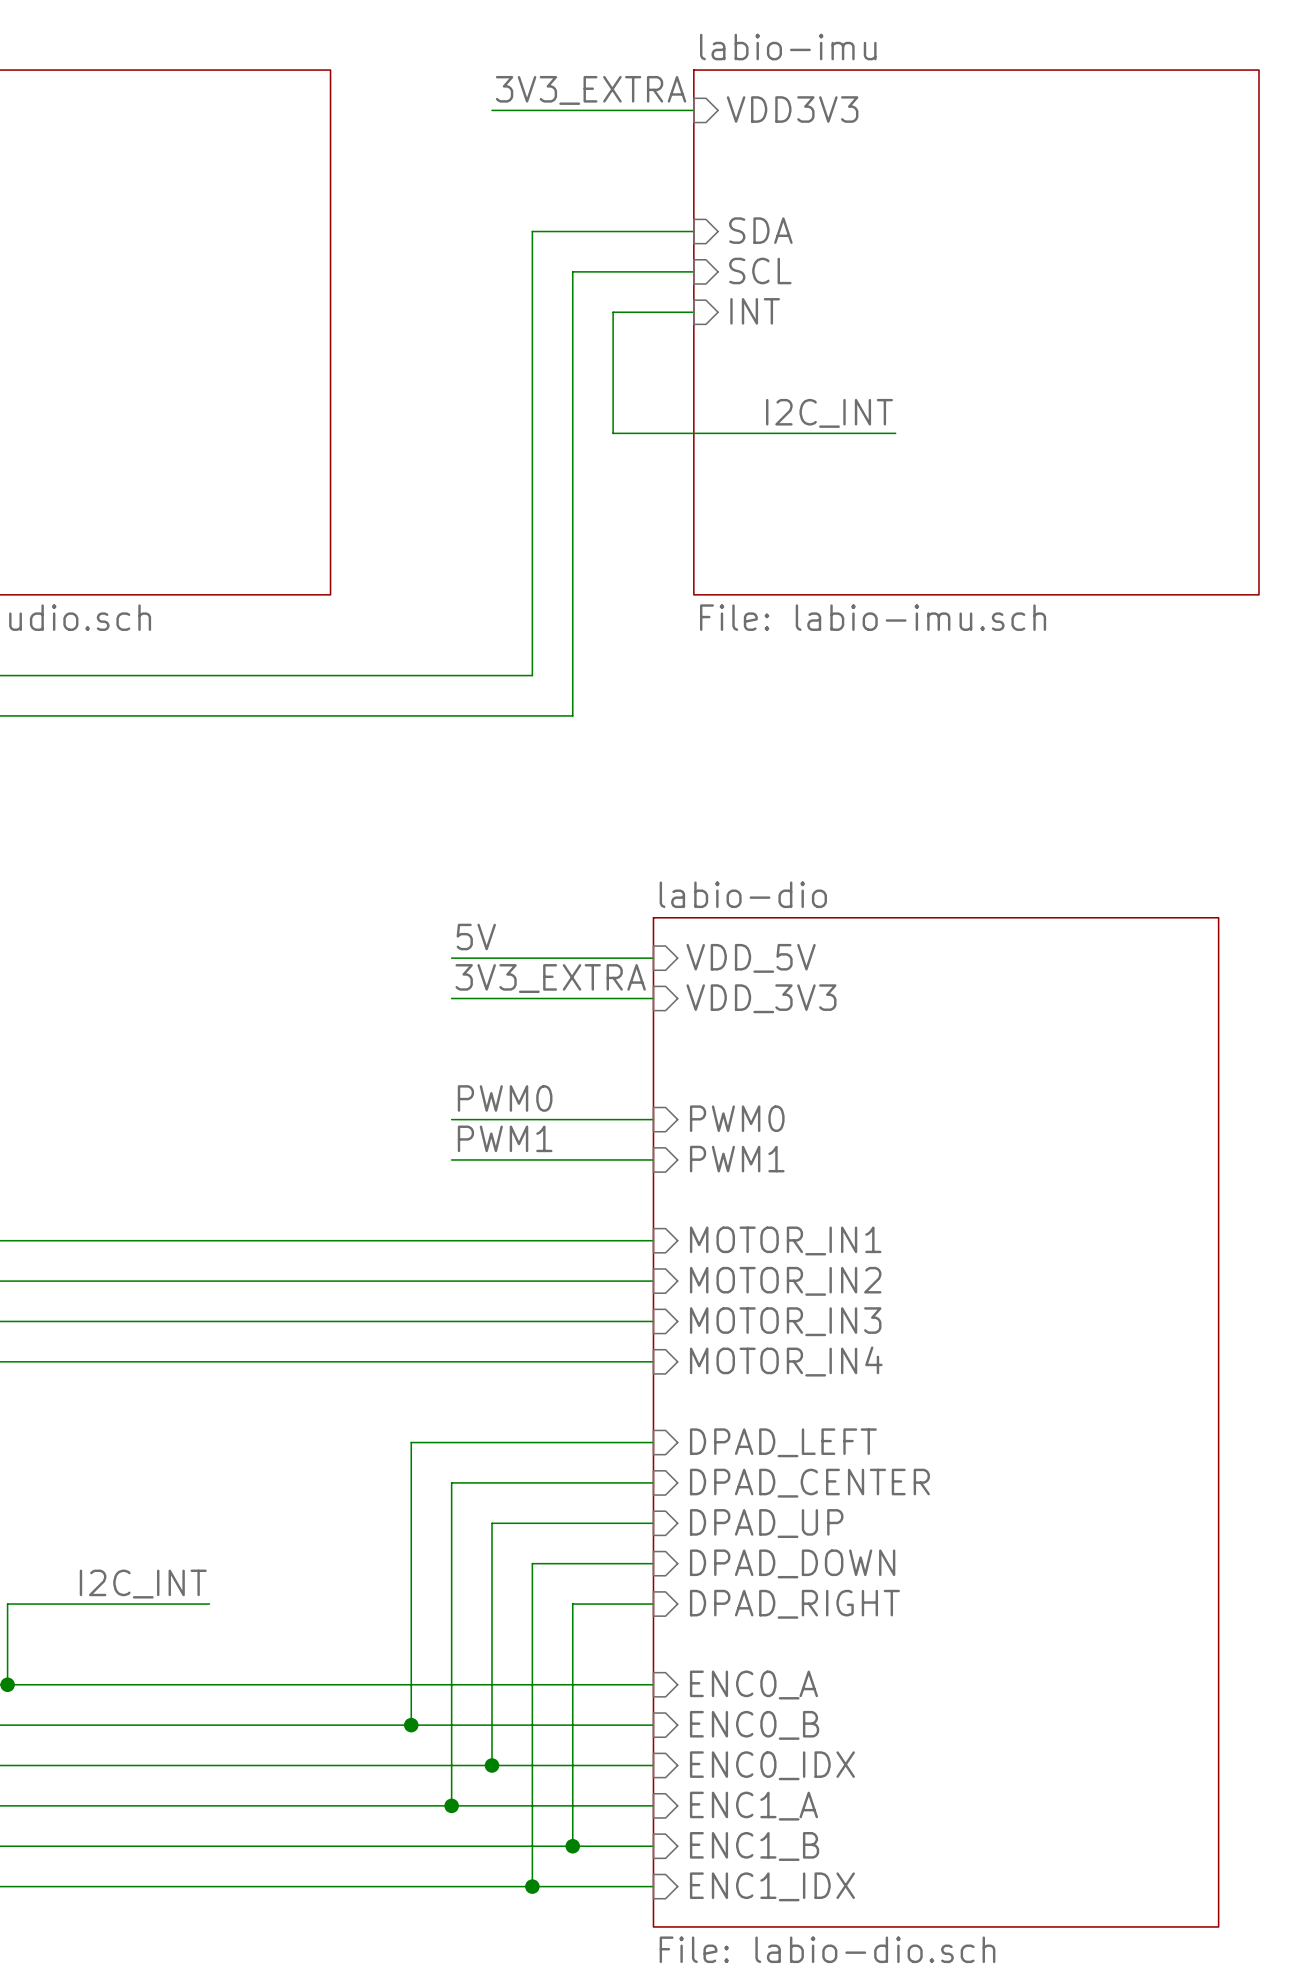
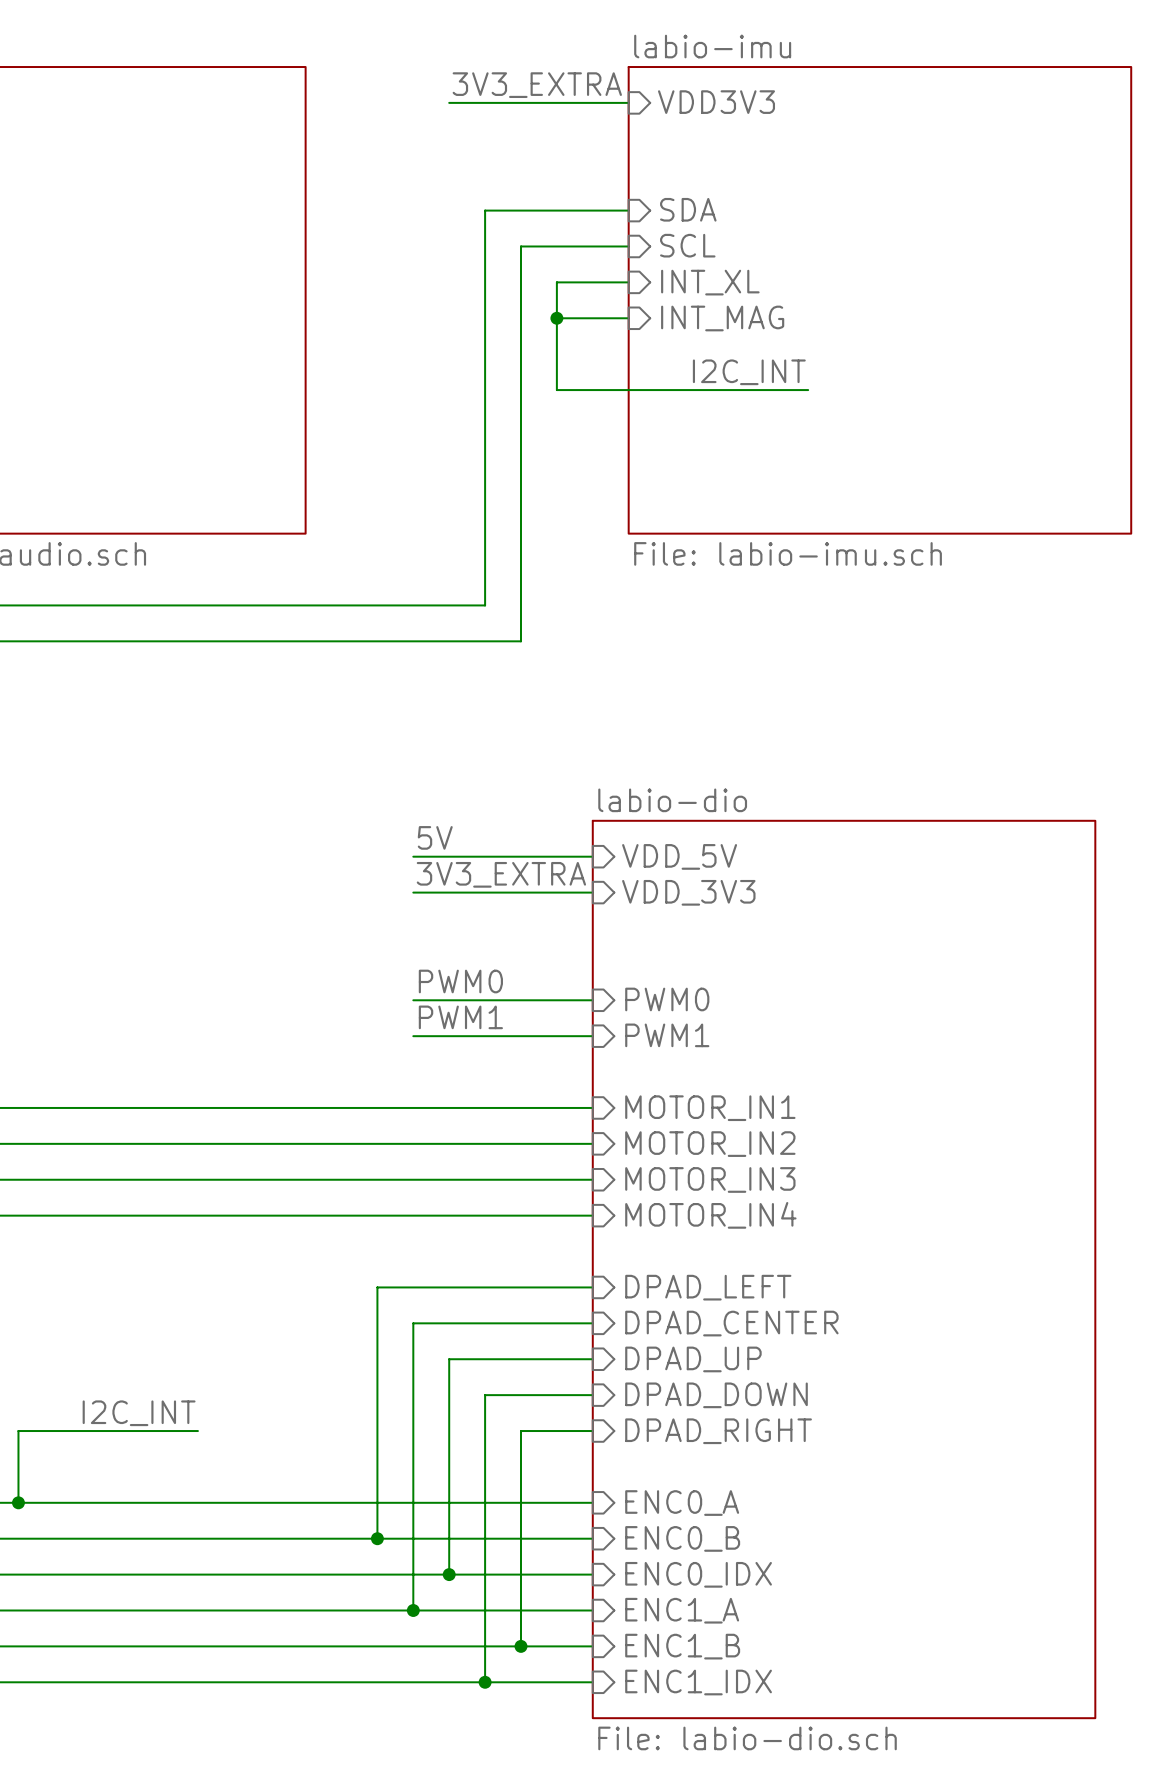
sheet pin: INT (755, 311) -> INT_XL (710, 282)
wire: none -> (556, 318) (628, 318)
junction: none -> (556, 318)
sheet pin: none -> INT_MAG (722, 318)

